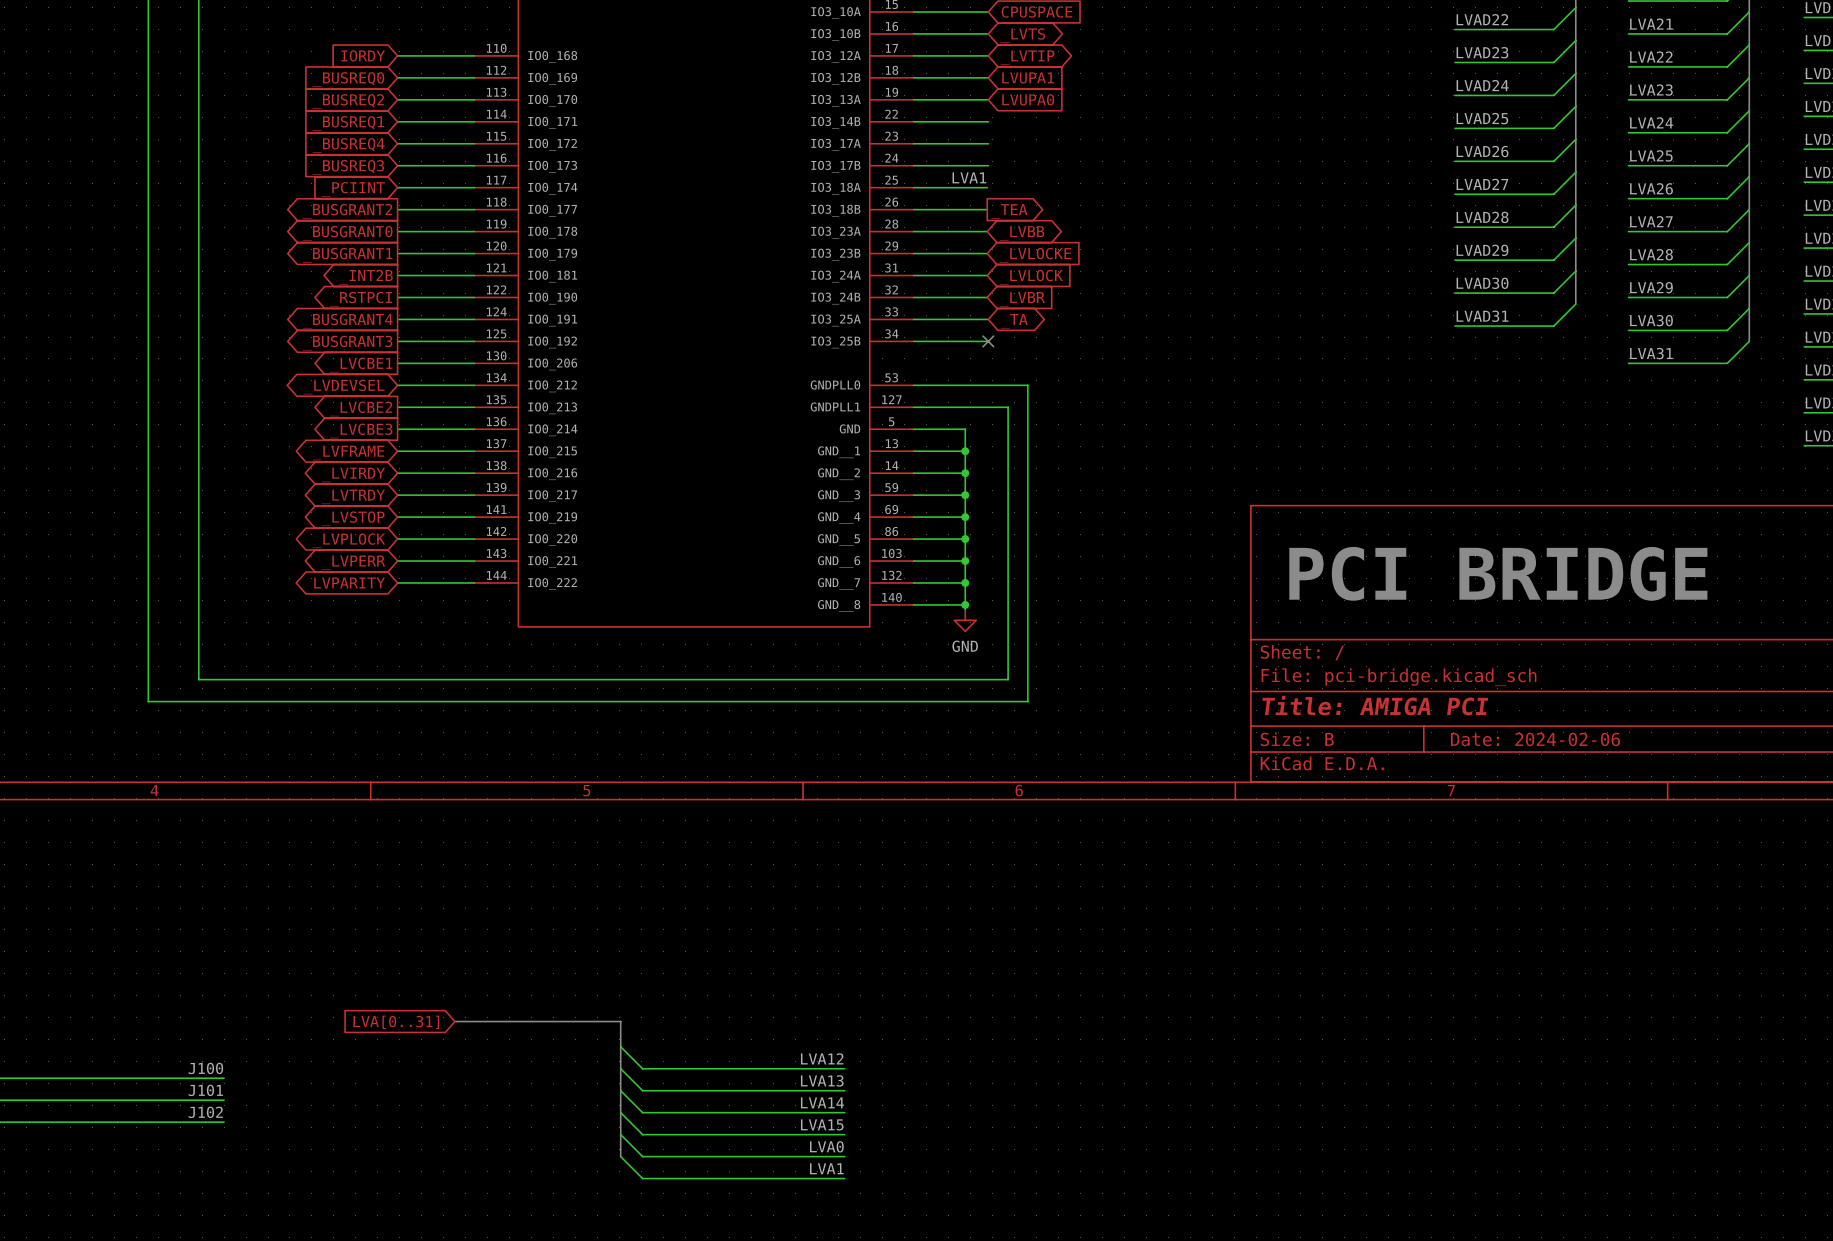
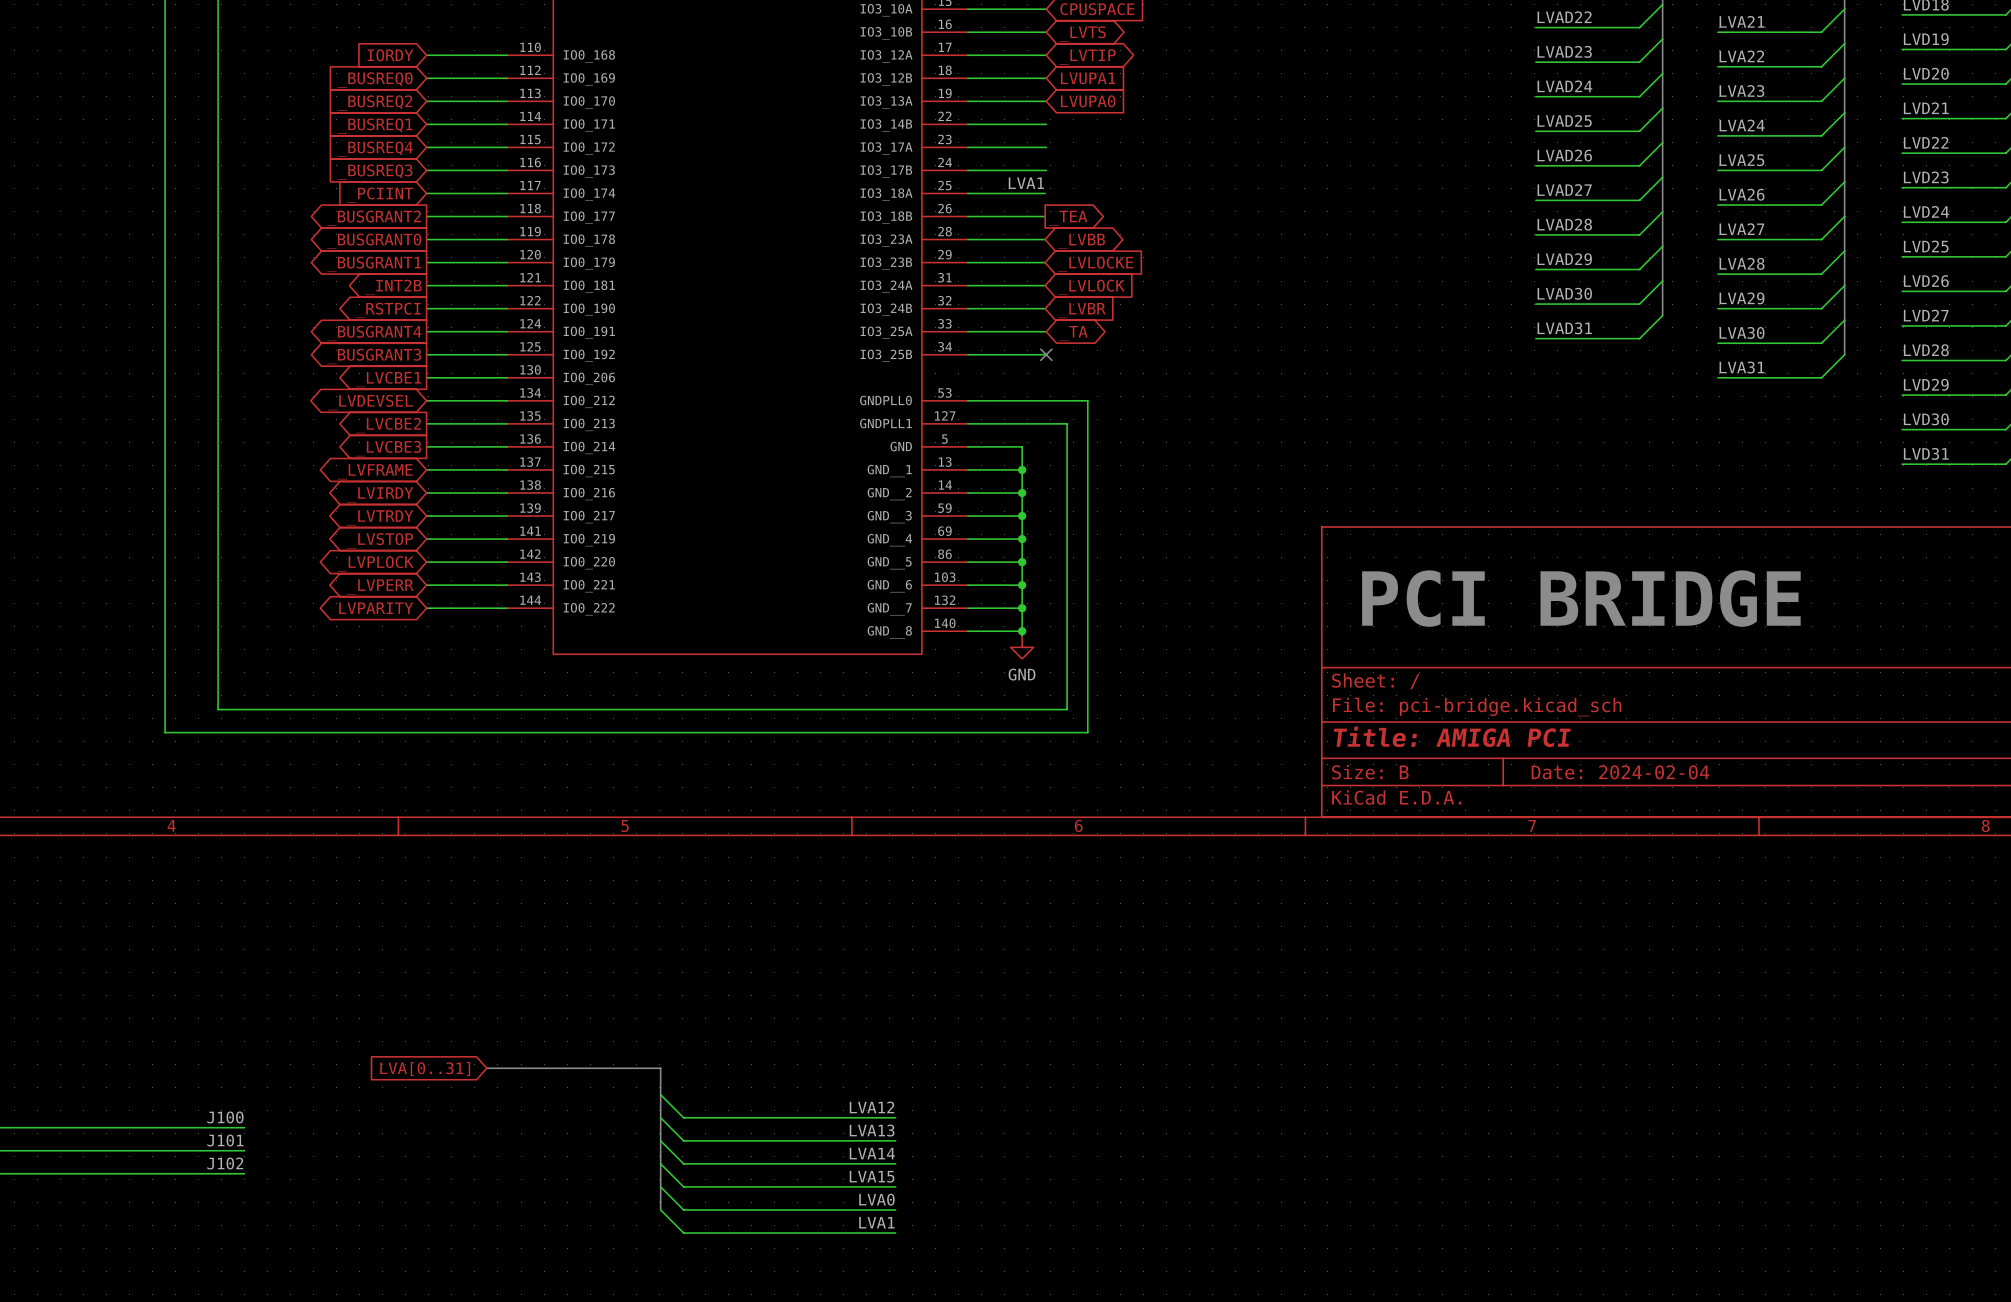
title block: Date: 2024-02-06 (1535, 739) -> Date: 2024-02-04 (1620, 772)

